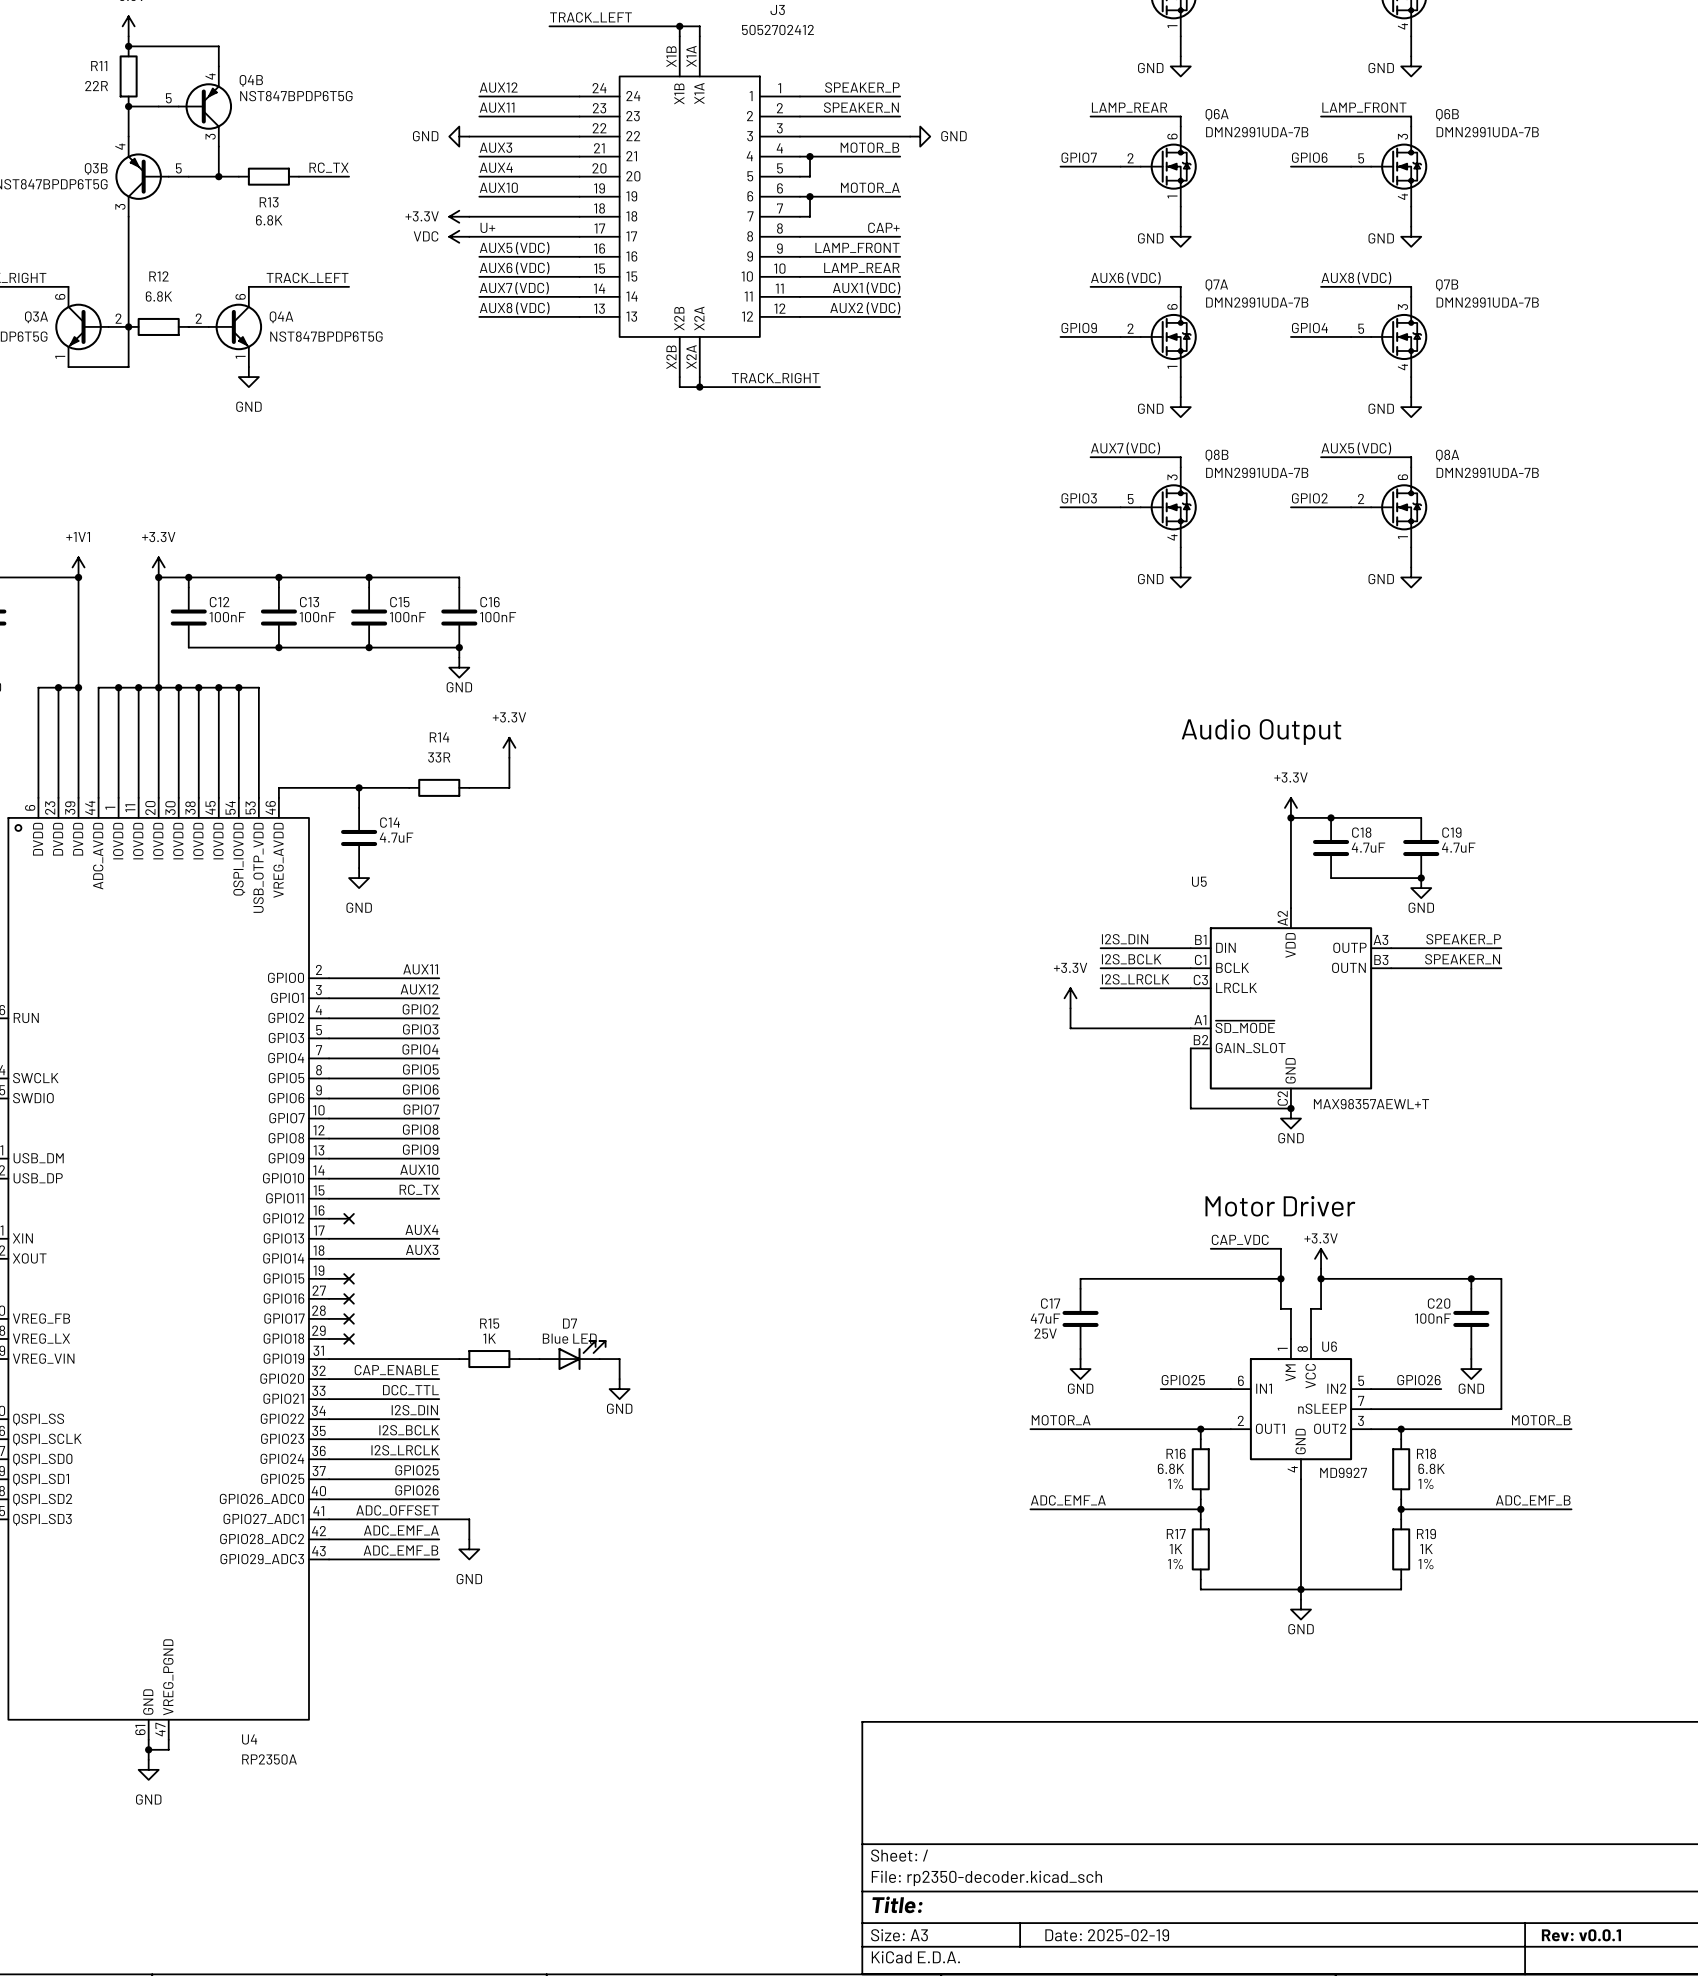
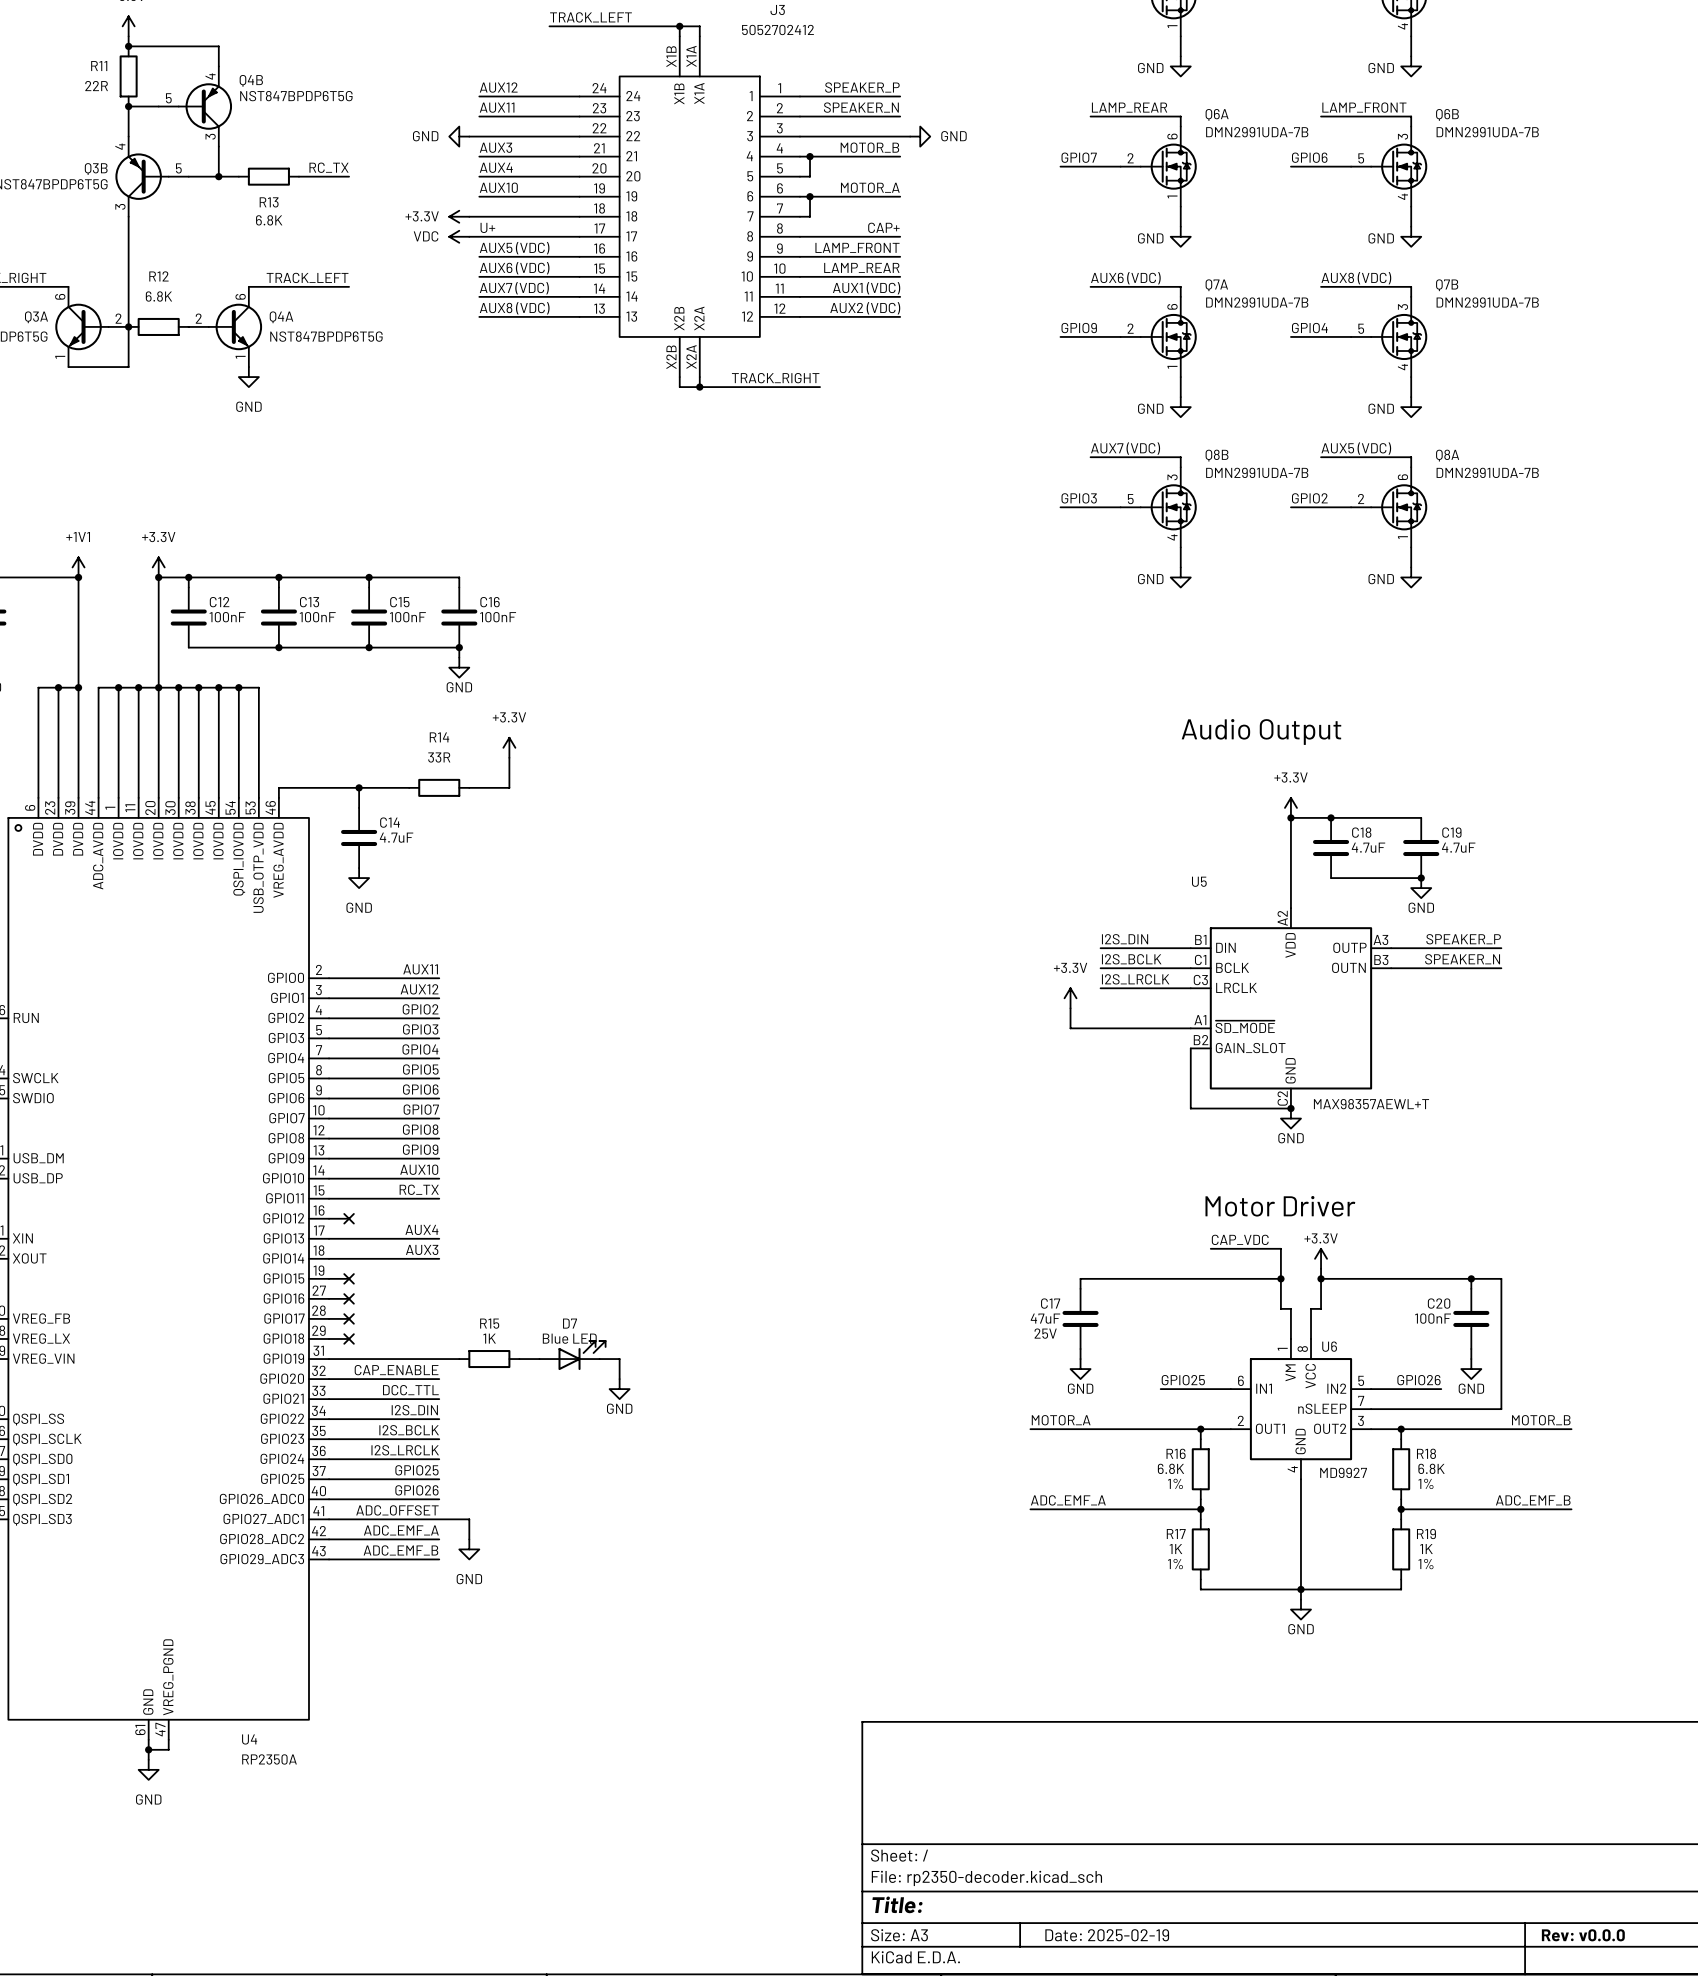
title block: Rev: v0.0.1 (1581, 1935) -> Rev: v0.0.0 (1583, 1935)

